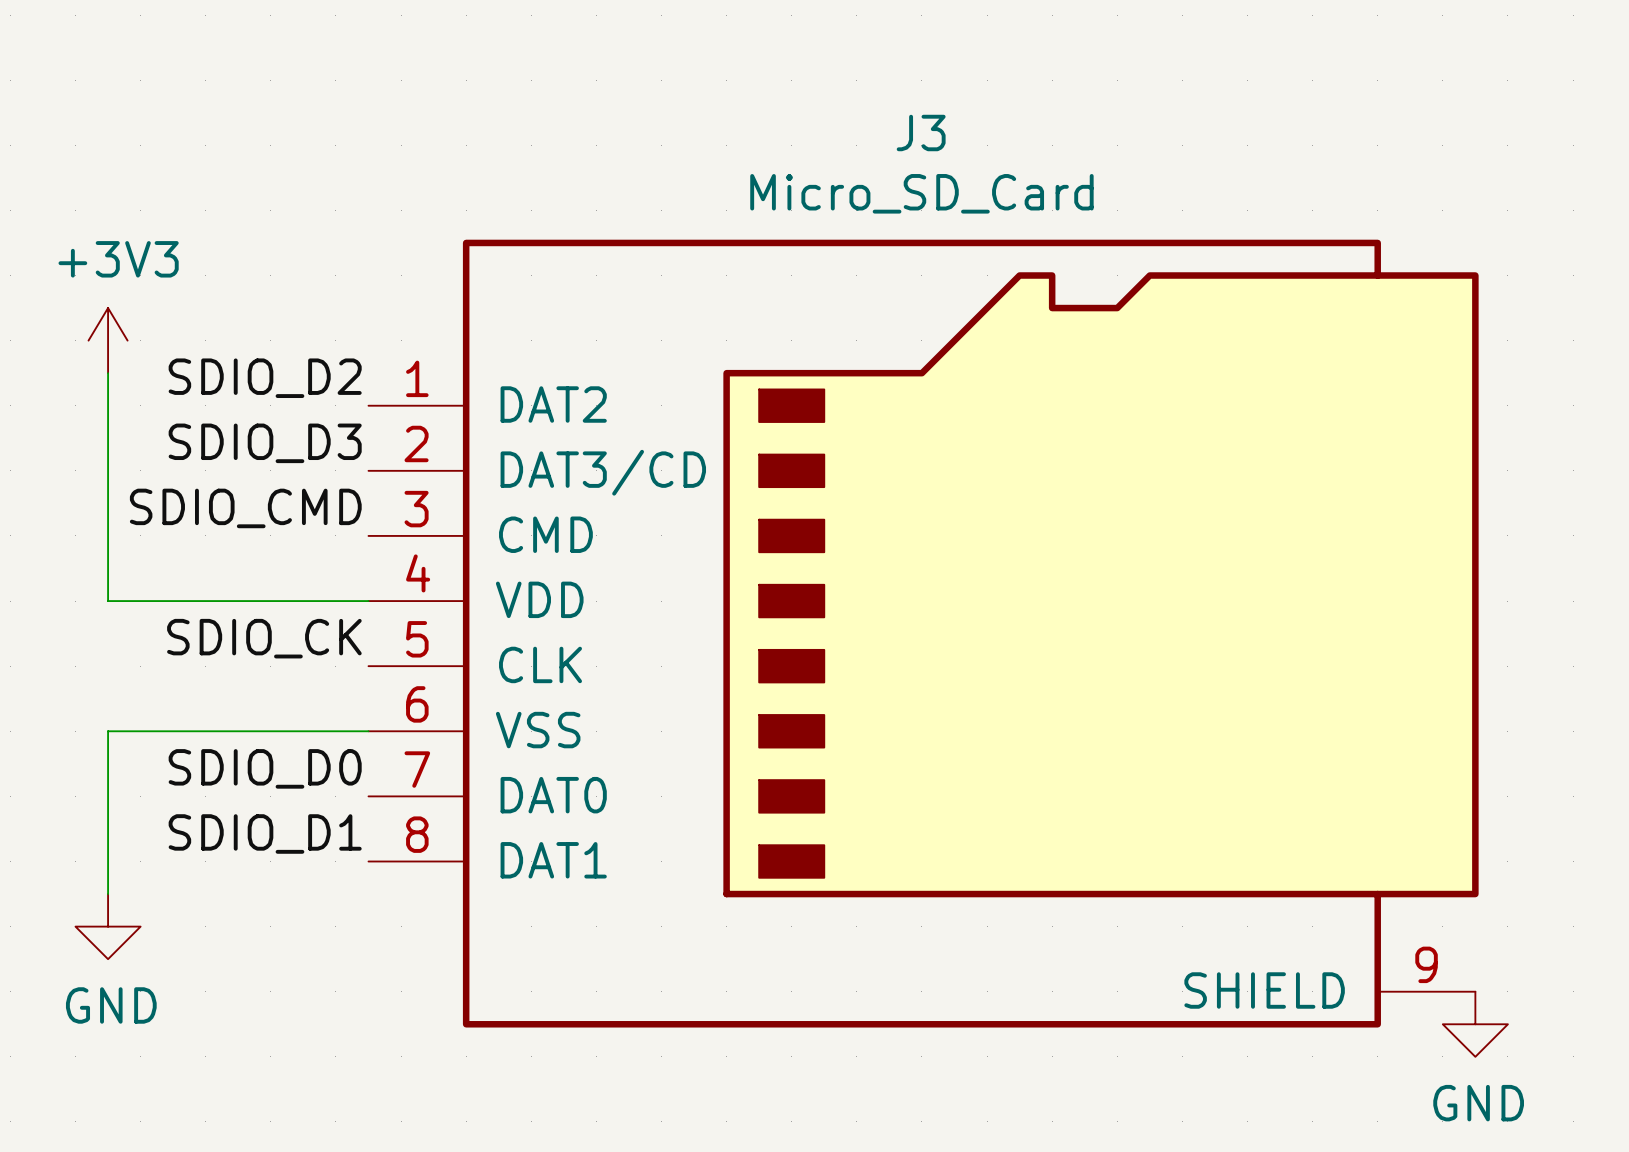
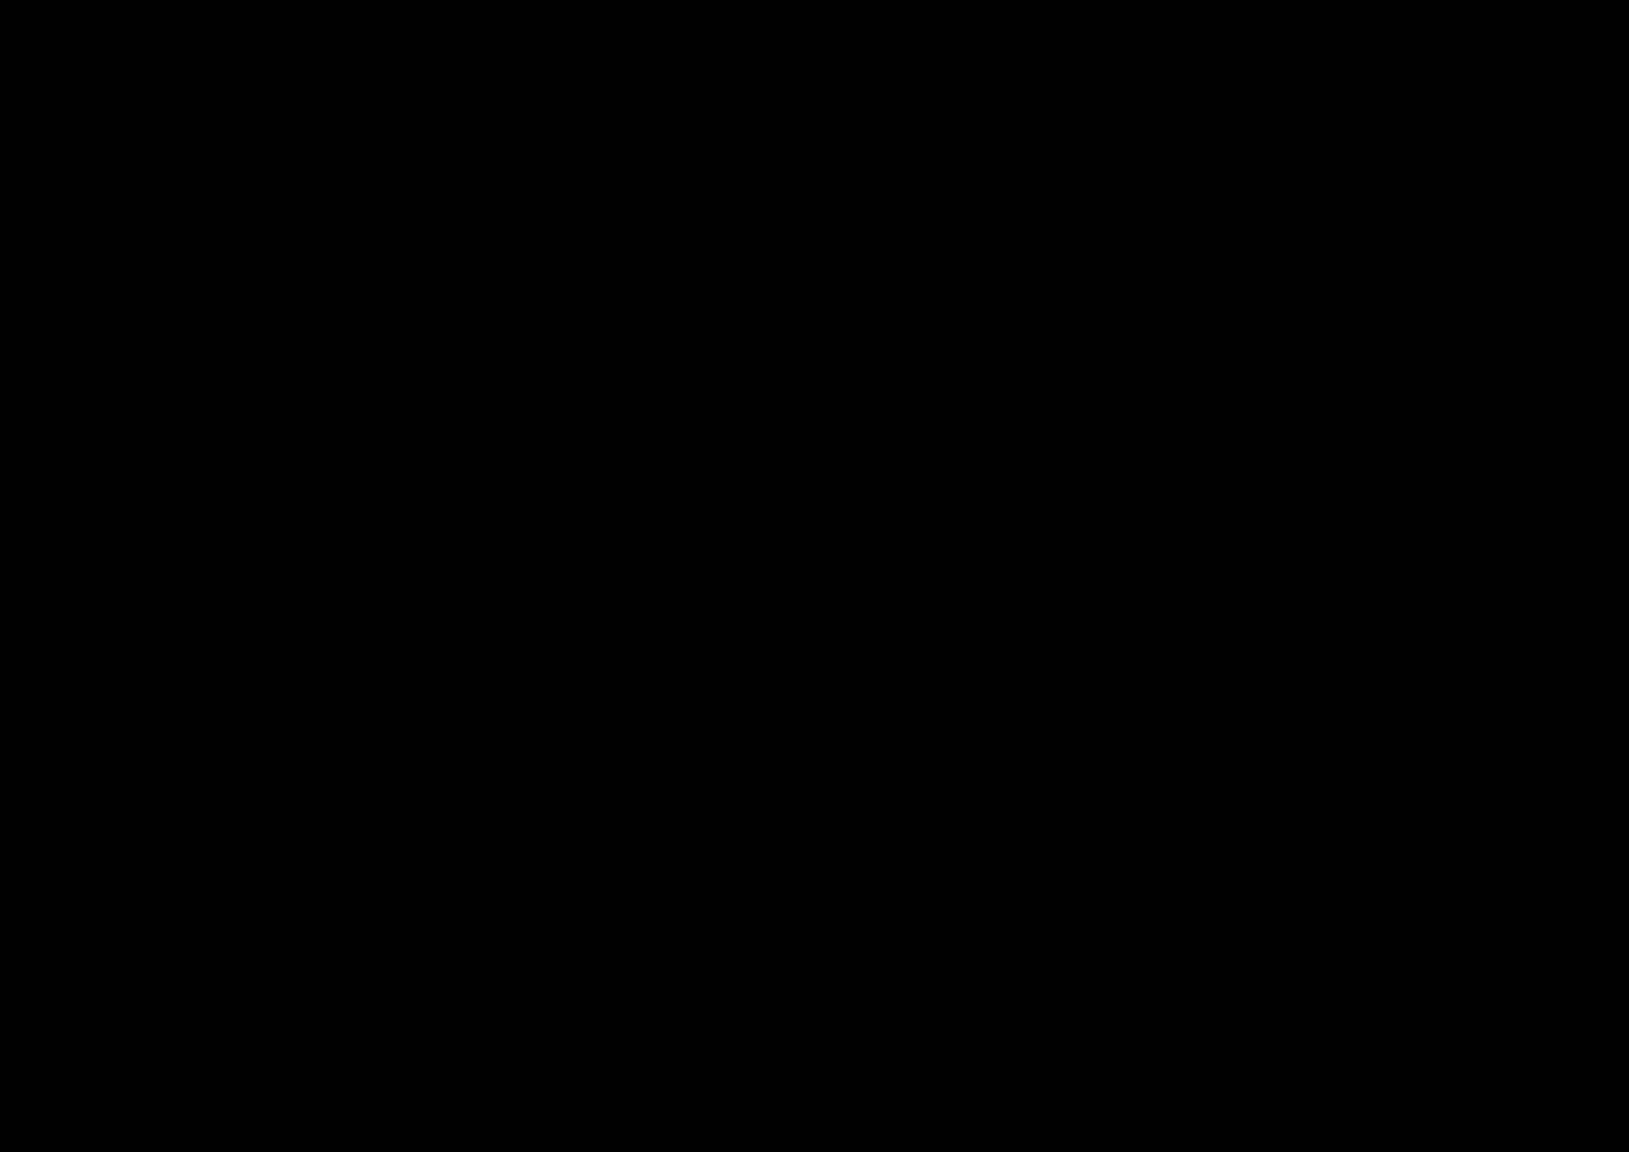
power symbol: +3V3 (108, 340) -> none
wire: (108, 373) (108, 601) (368, 601) -> none
label: SDIO_D2 (265, 378) -> none
label: SDIO_D3 (265, 443) -> none
label: SDIO_CMD (245, 508) -> none
J3: Micro_SD_Card (923, 633) -> none
label: SDIO_CK (264, 638) -> none
wire: (368, 731) (108, 731) (108, 894) -> none
label: SDIO_D0 (265, 768) -> none
label: SDIO_D1 (265, 833) -> none
power symbol: GND (108, 926) -> none
power symbol: GND (1475, 1024) -> none

